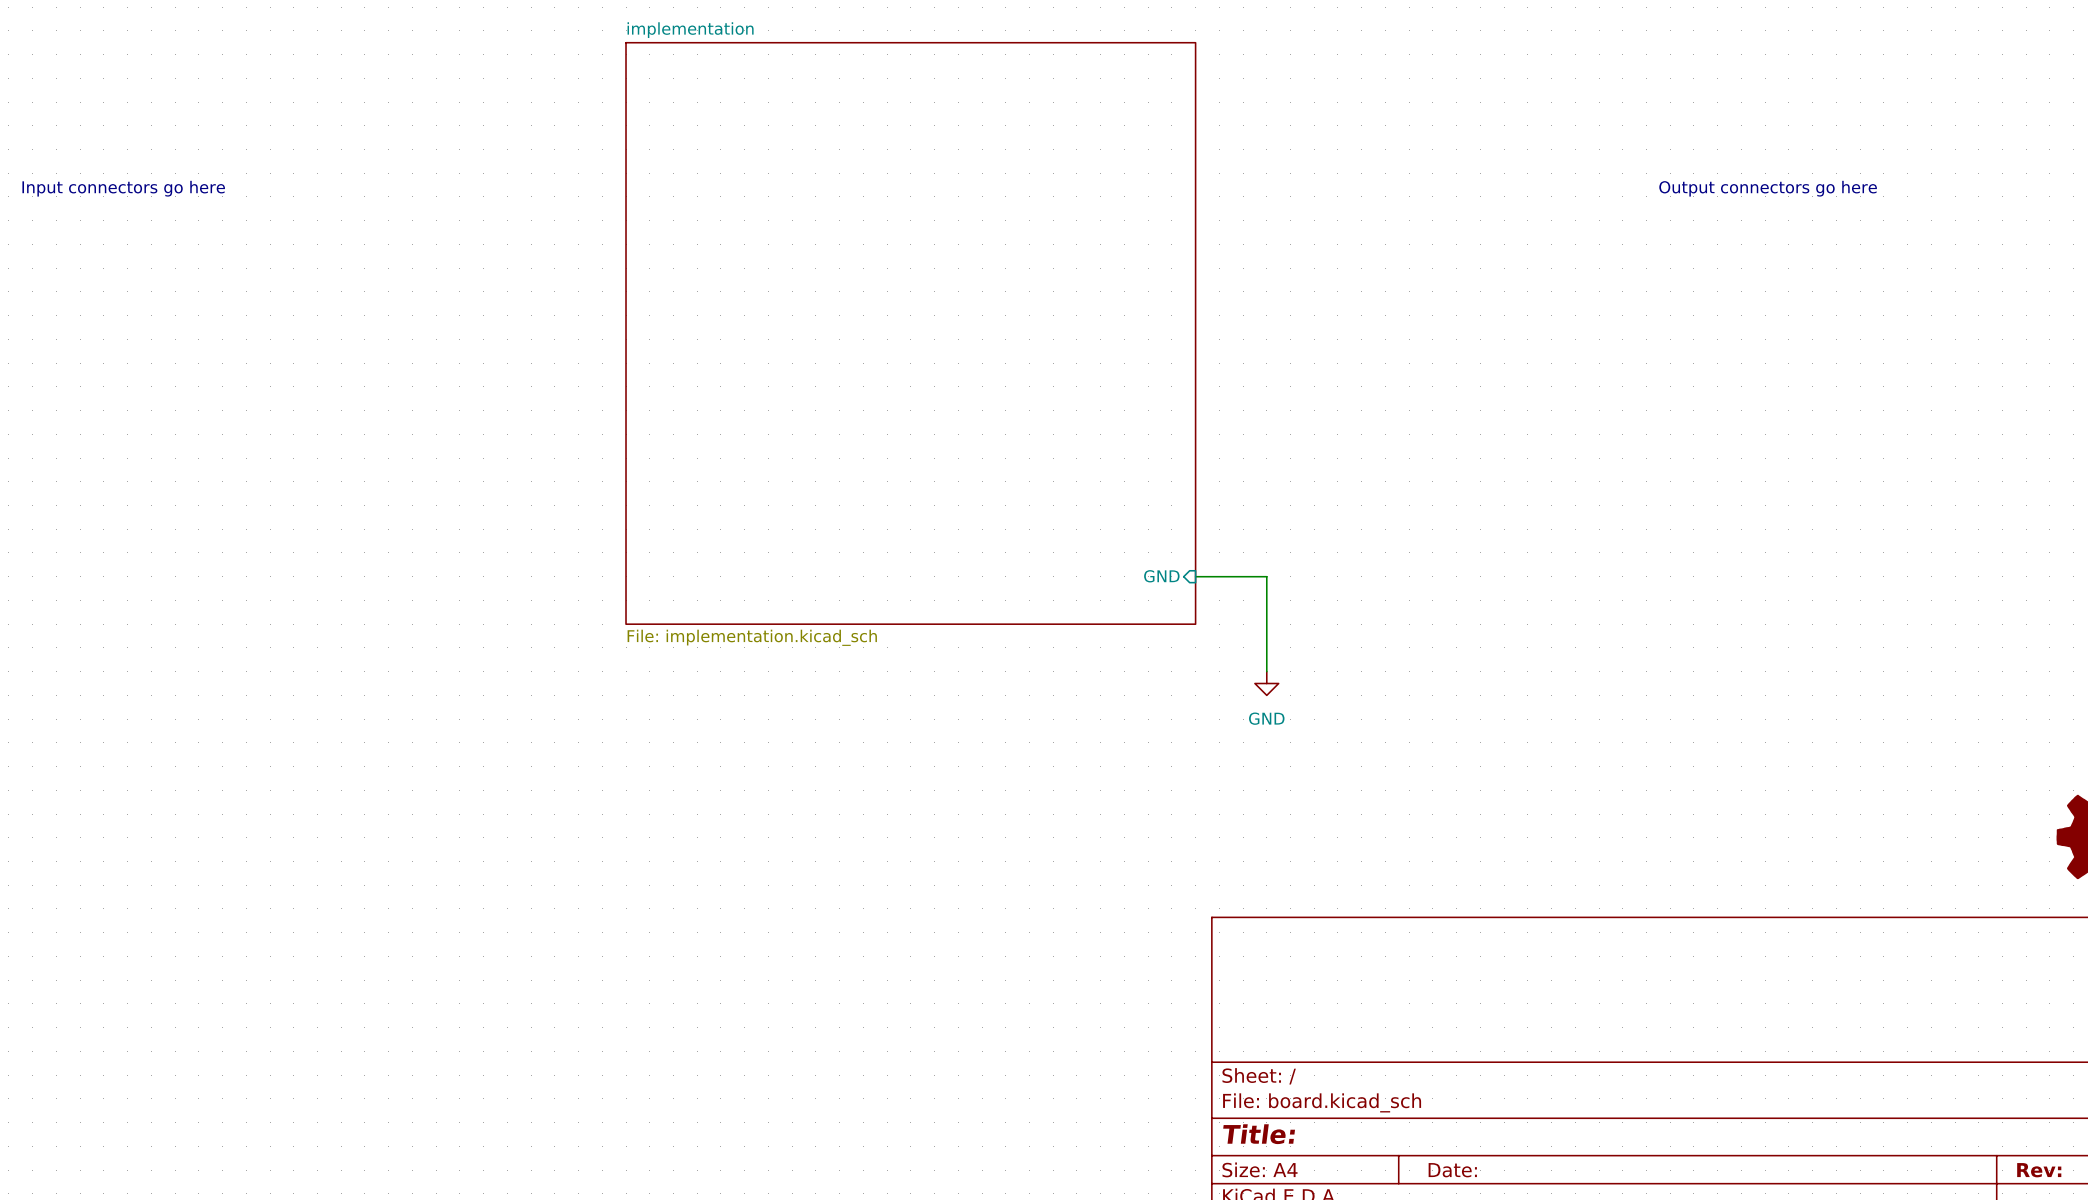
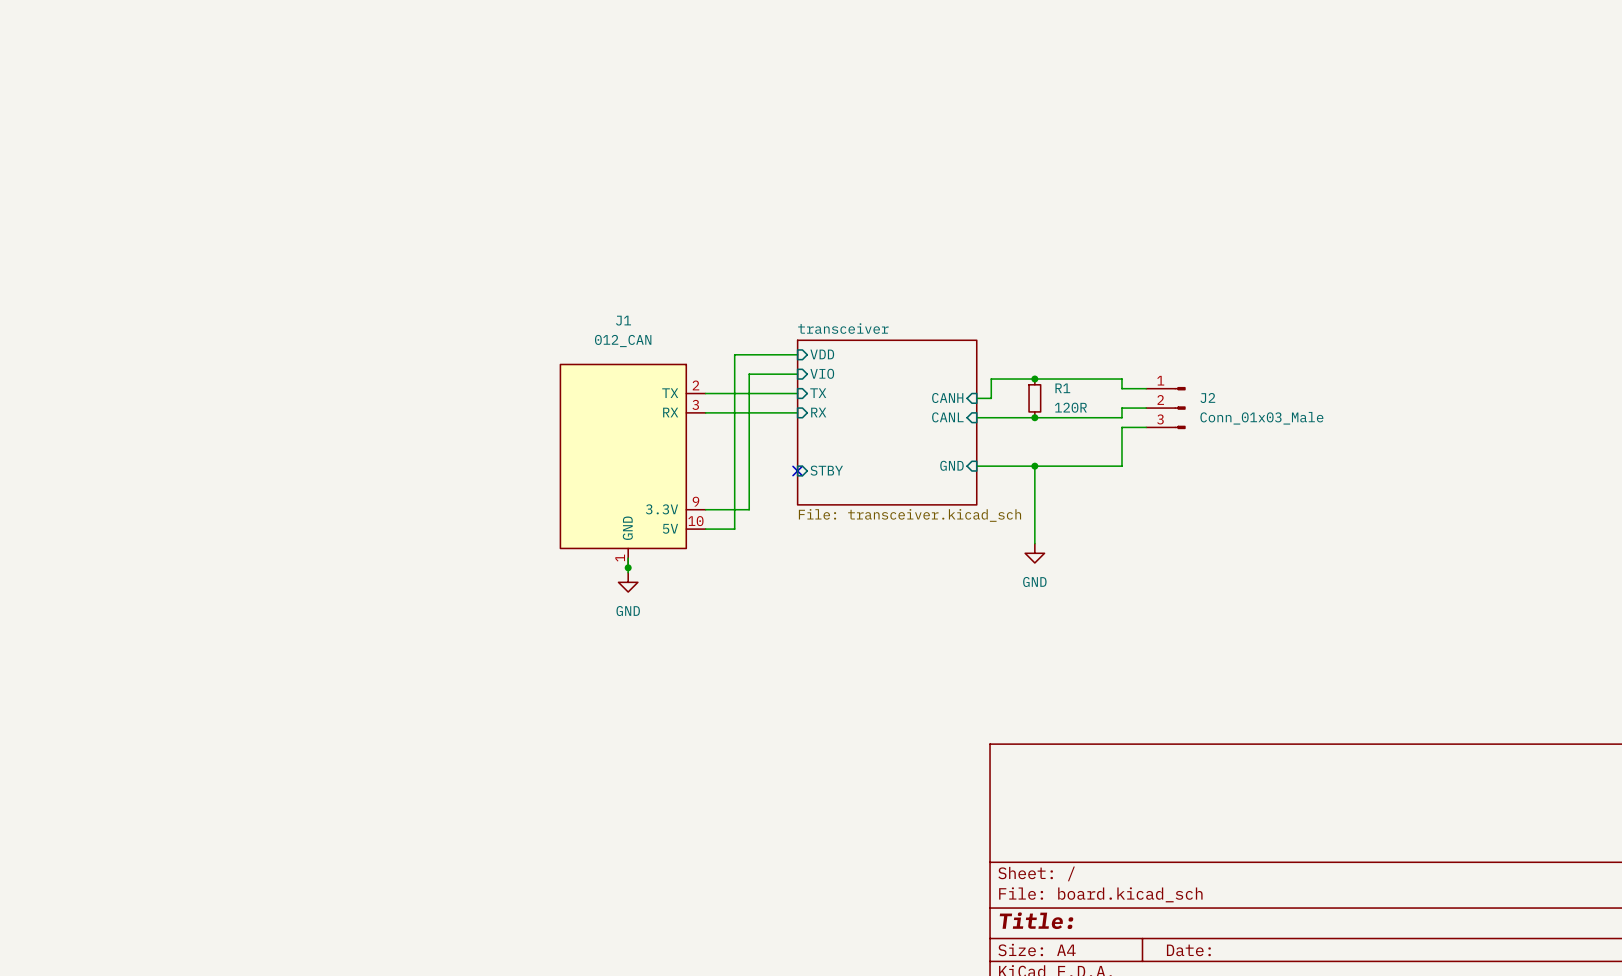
text: Input connectors go here (123, 188) -> none
text: Output connectors go here (1768, 188) -> none
sheet implementation: File: implementation.kicad_sch (910, 333) -> none
sheet pin: none -> VDD (822, 354)
wire: none -> (797, 354) (734, 354) (734, 529) (705, 529)
wire: none -> (797, 374) (749, 374) (749, 509) (705, 509)
sheet pin: none -> VIO (822, 373)
junction: none -> (1034, 379)
wire: none -> (1146, 388) (1121, 388) (1121, 379) (991, 379) (991, 398) (976, 398)
wire: none -> (705, 393) (797, 393)
sheet pin: none -> TX (818, 393)
sheet pin: none -> CANH (947, 398)
R1: none -> 120R (1034, 398)
wire: none -> (1146, 408) (1121, 408) (1121, 417) (976, 417)
J2: none -> Conn_01x03_Male (1165, 408)
wire: none -> (705, 412) (797, 412)
sheet pin: none -> RX (818, 412)
sheet pin: none -> CANL (947, 417)
junction: none -> (1034, 417)
sheet transceiver: none -> File: transceiver.kicad_sch (887, 422)
wire: none -> (1146, 427) (1121, 427) (1121, 466) (1034, 466)
J1: none -> 012_CAN (633, 466)
junction: none -> (1034, 466)
no-connect mark: none -> (797, 470)
sheet pin: none -> STBY (826, 470)
wire: none -> (628, 558) (628, 572)
junction: none -> (628, 567)
power symbol: none -> GND (628, 582)

